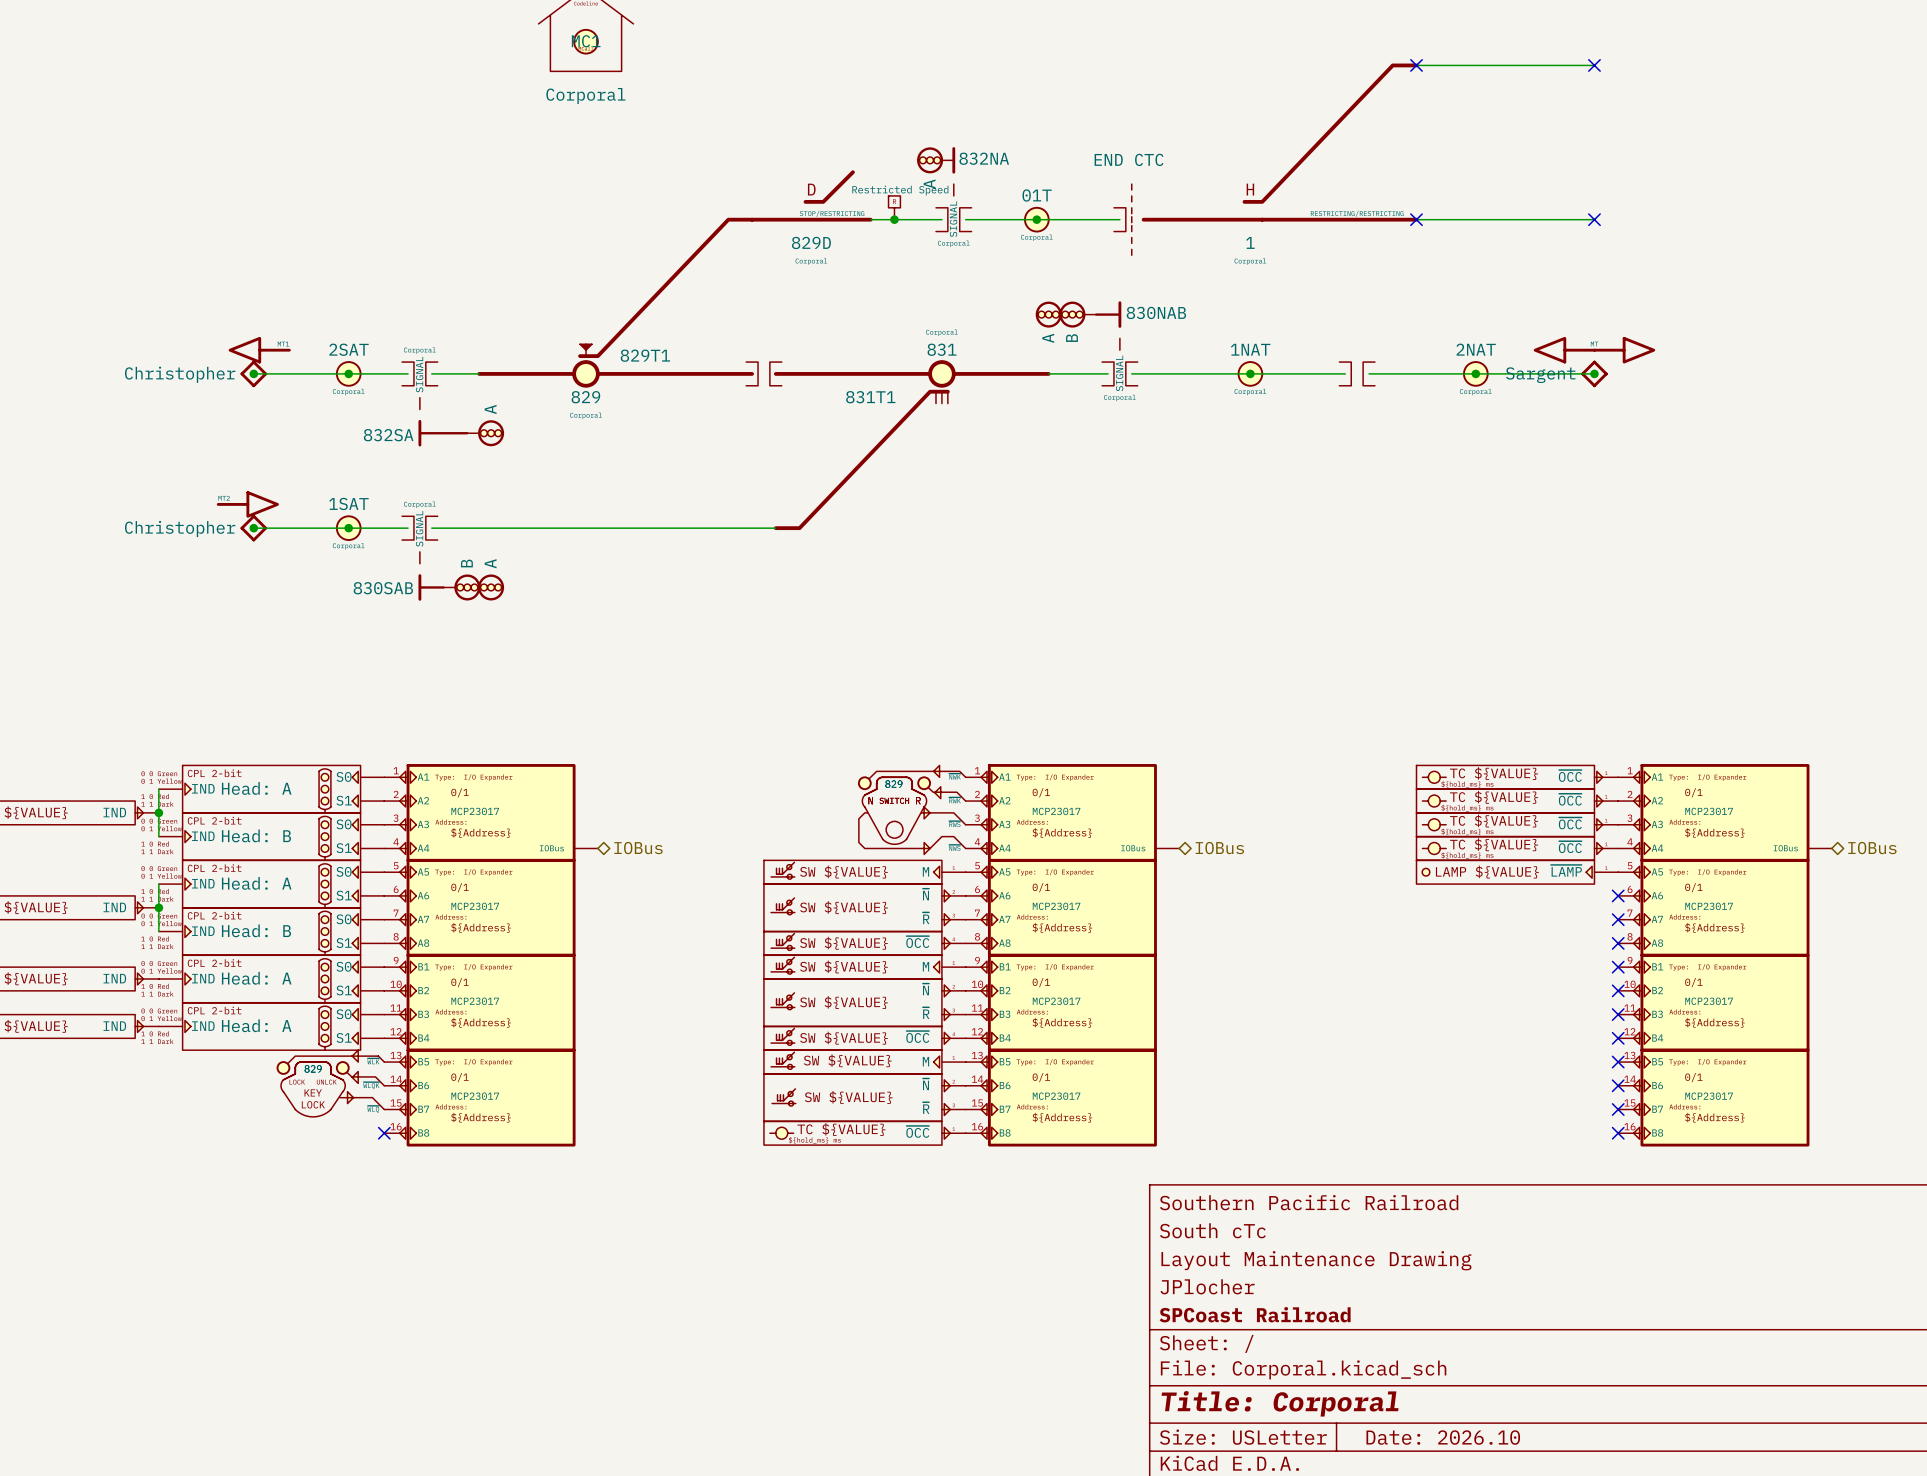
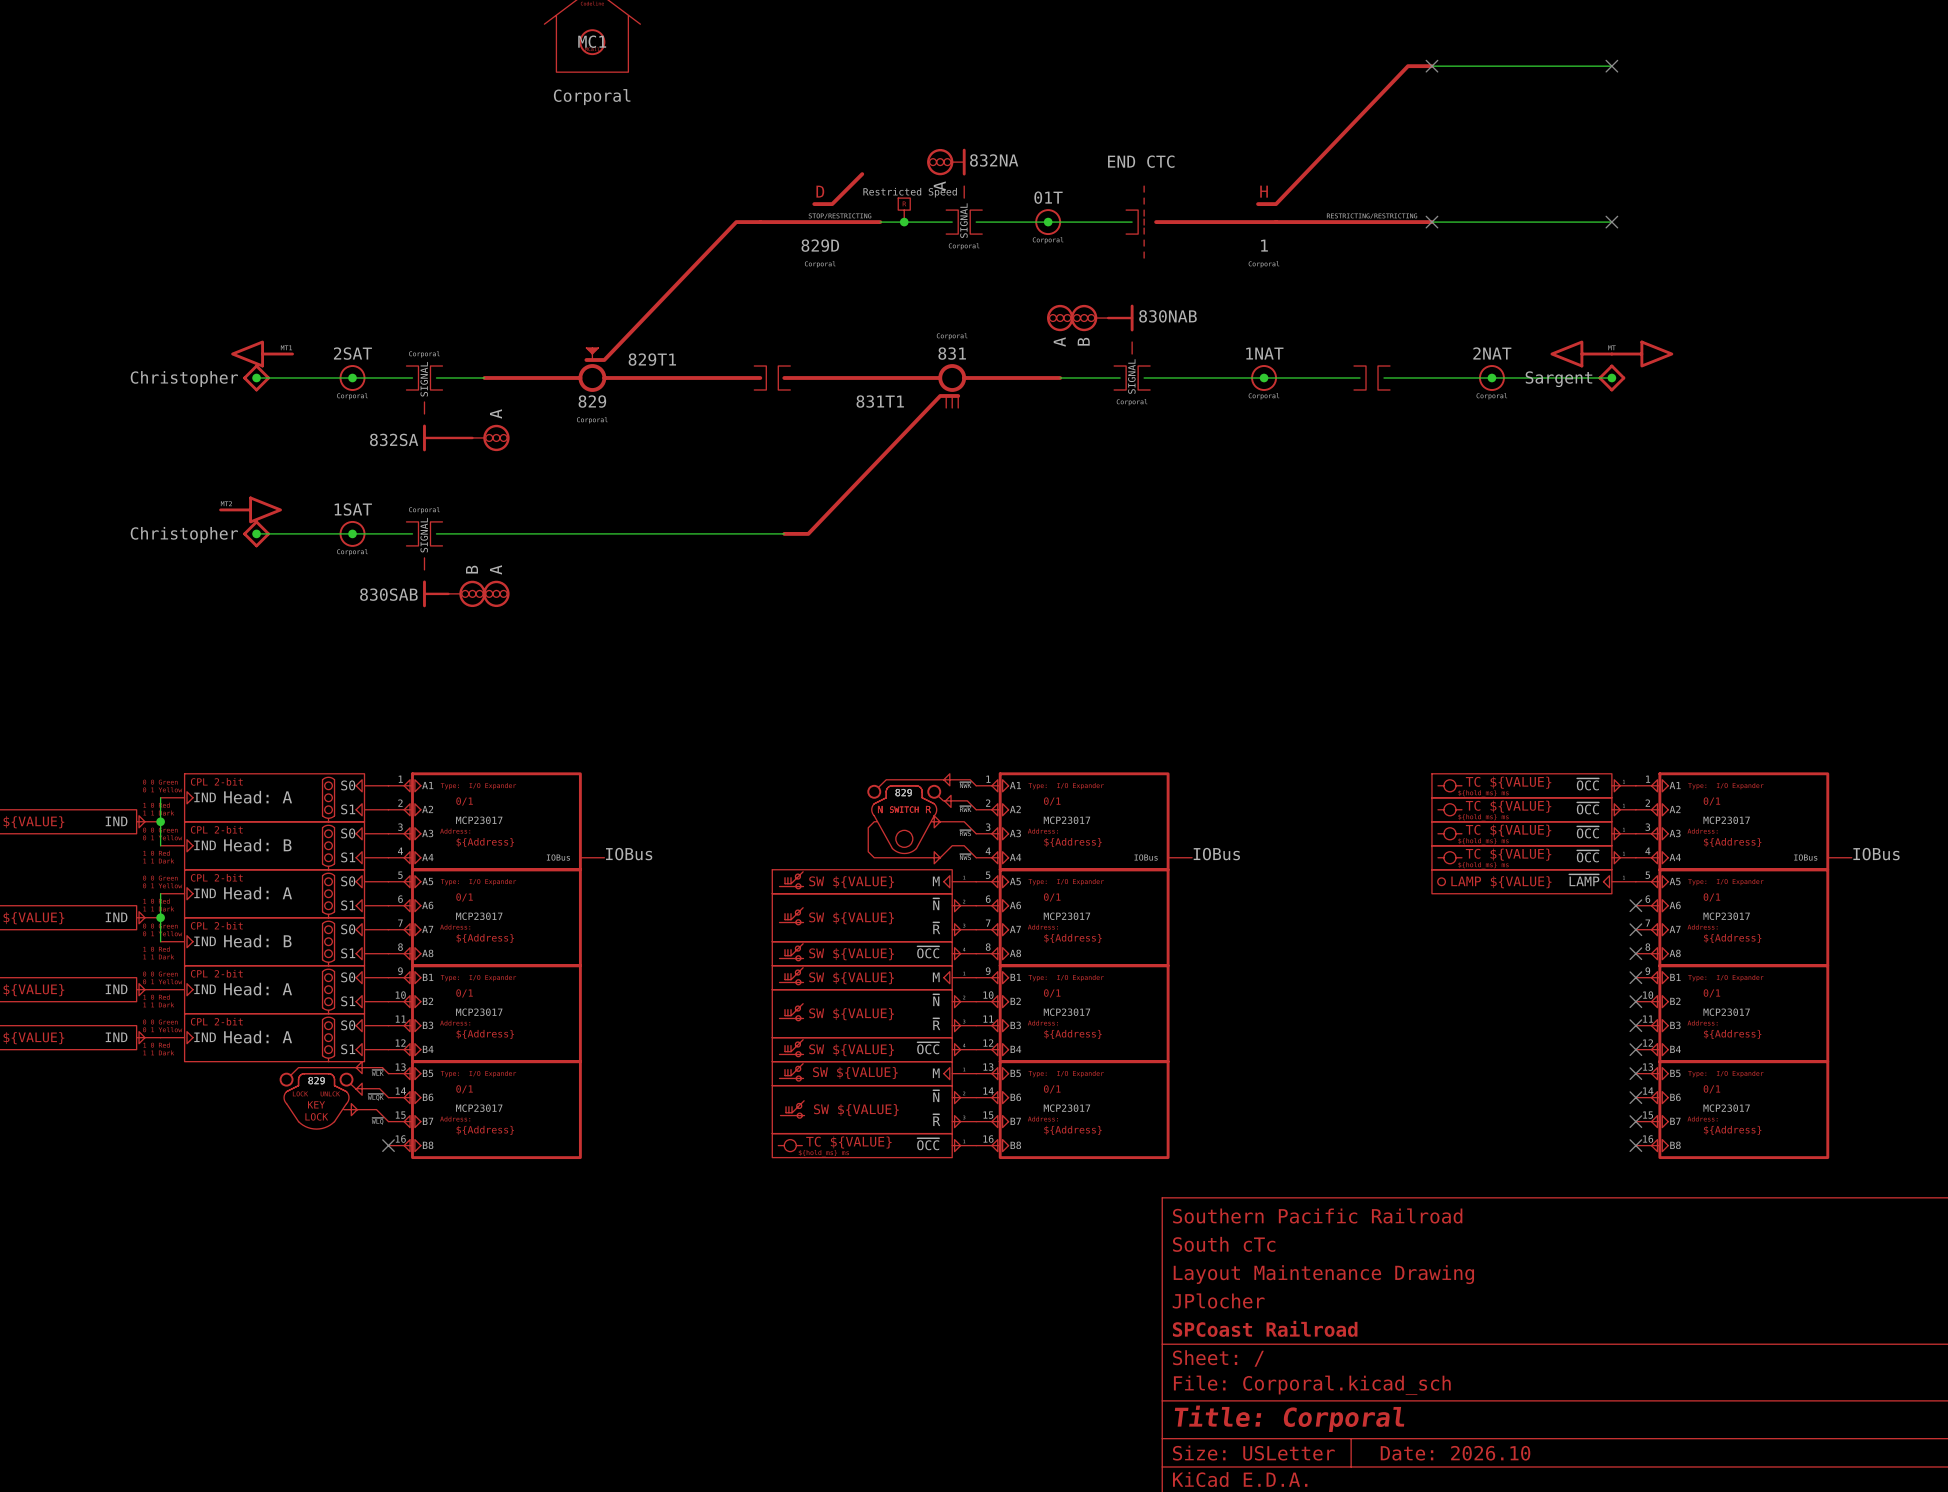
label: none -> IOBus (629, 854)
label: none -> IOBus (1216, 854)
label: none -> IOBus (1876, 854)
hierarchical label: IOBus (638, 848) -> none
hierarchical label: IOBus (1219, 848) -> none
hierarchical label: IOBus (1872, 848) -> none

